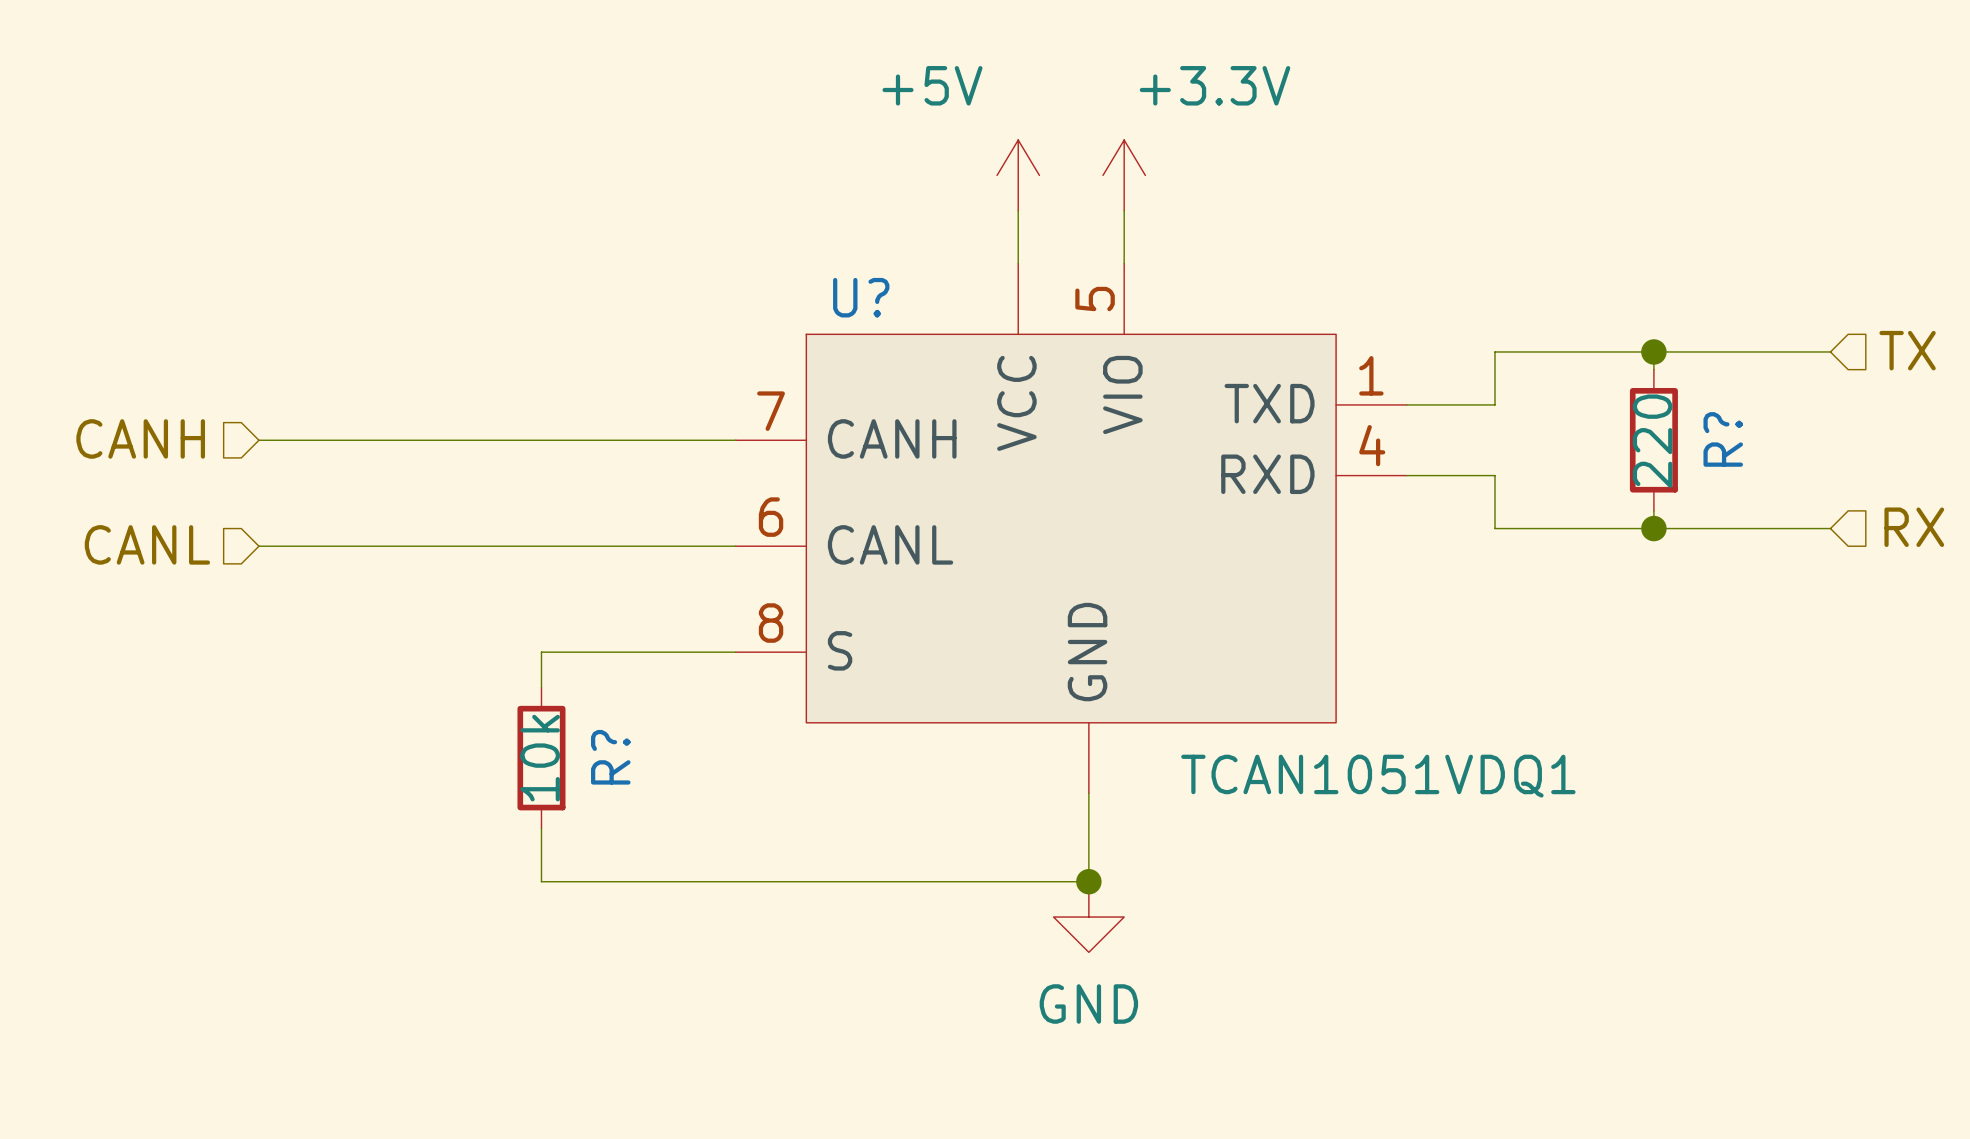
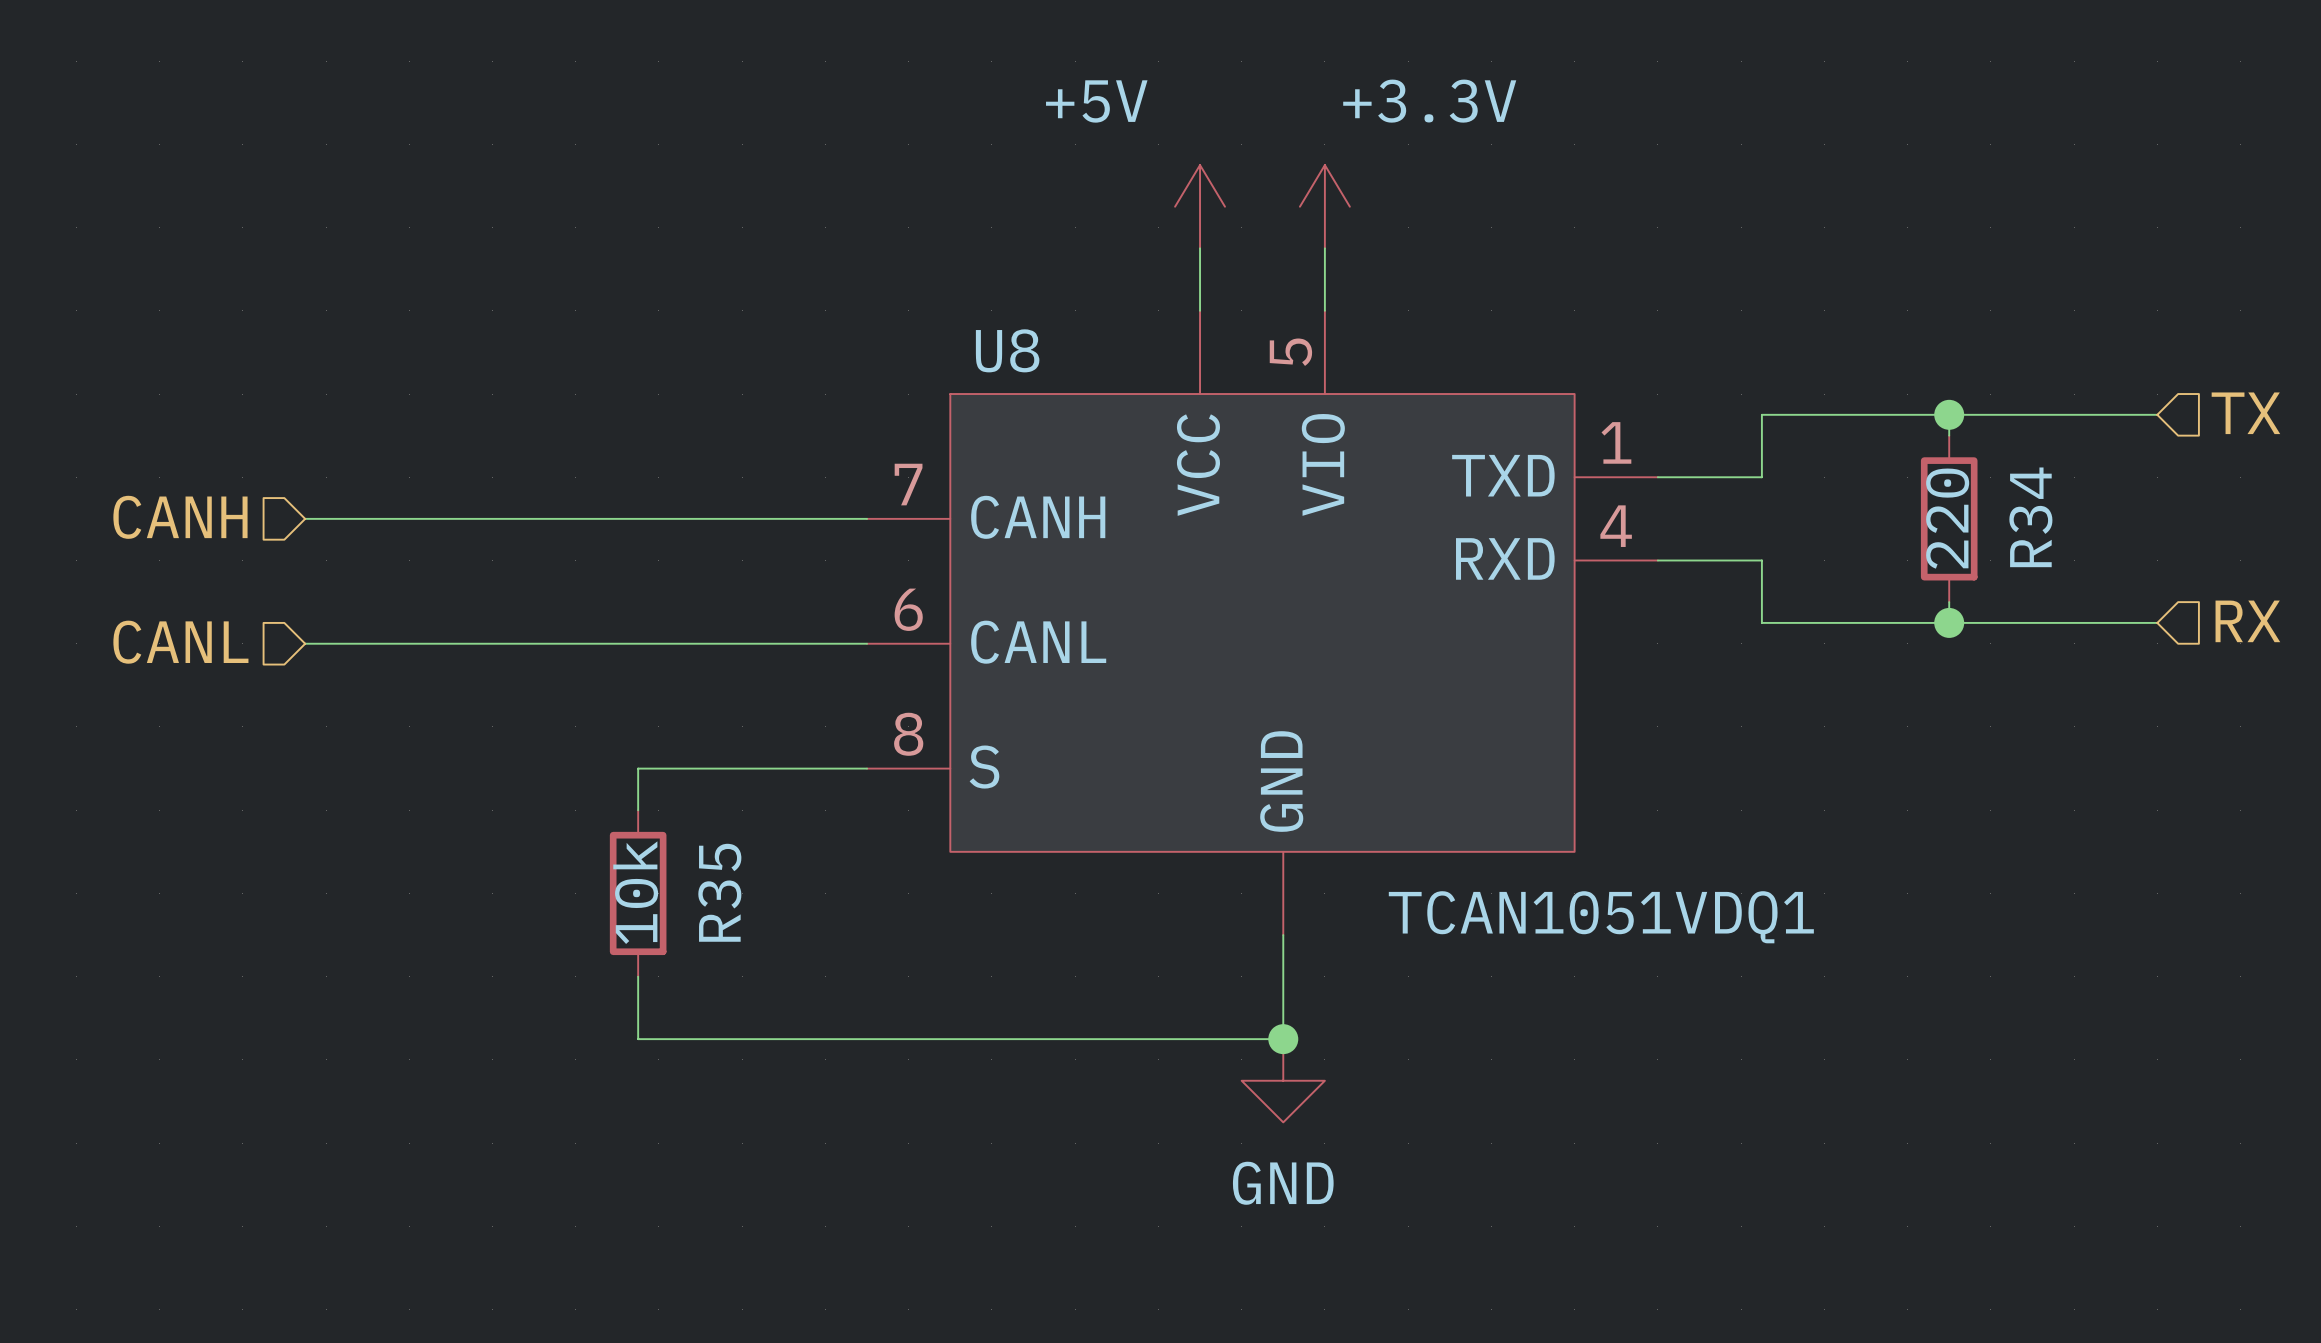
U? name: U? (861, 297) -> U8 (1007, 350)
R? name: R? (1723, 439) -> R34 (2030, 517)
R? name: R? (610, 757) -> R35 (719, 892)

